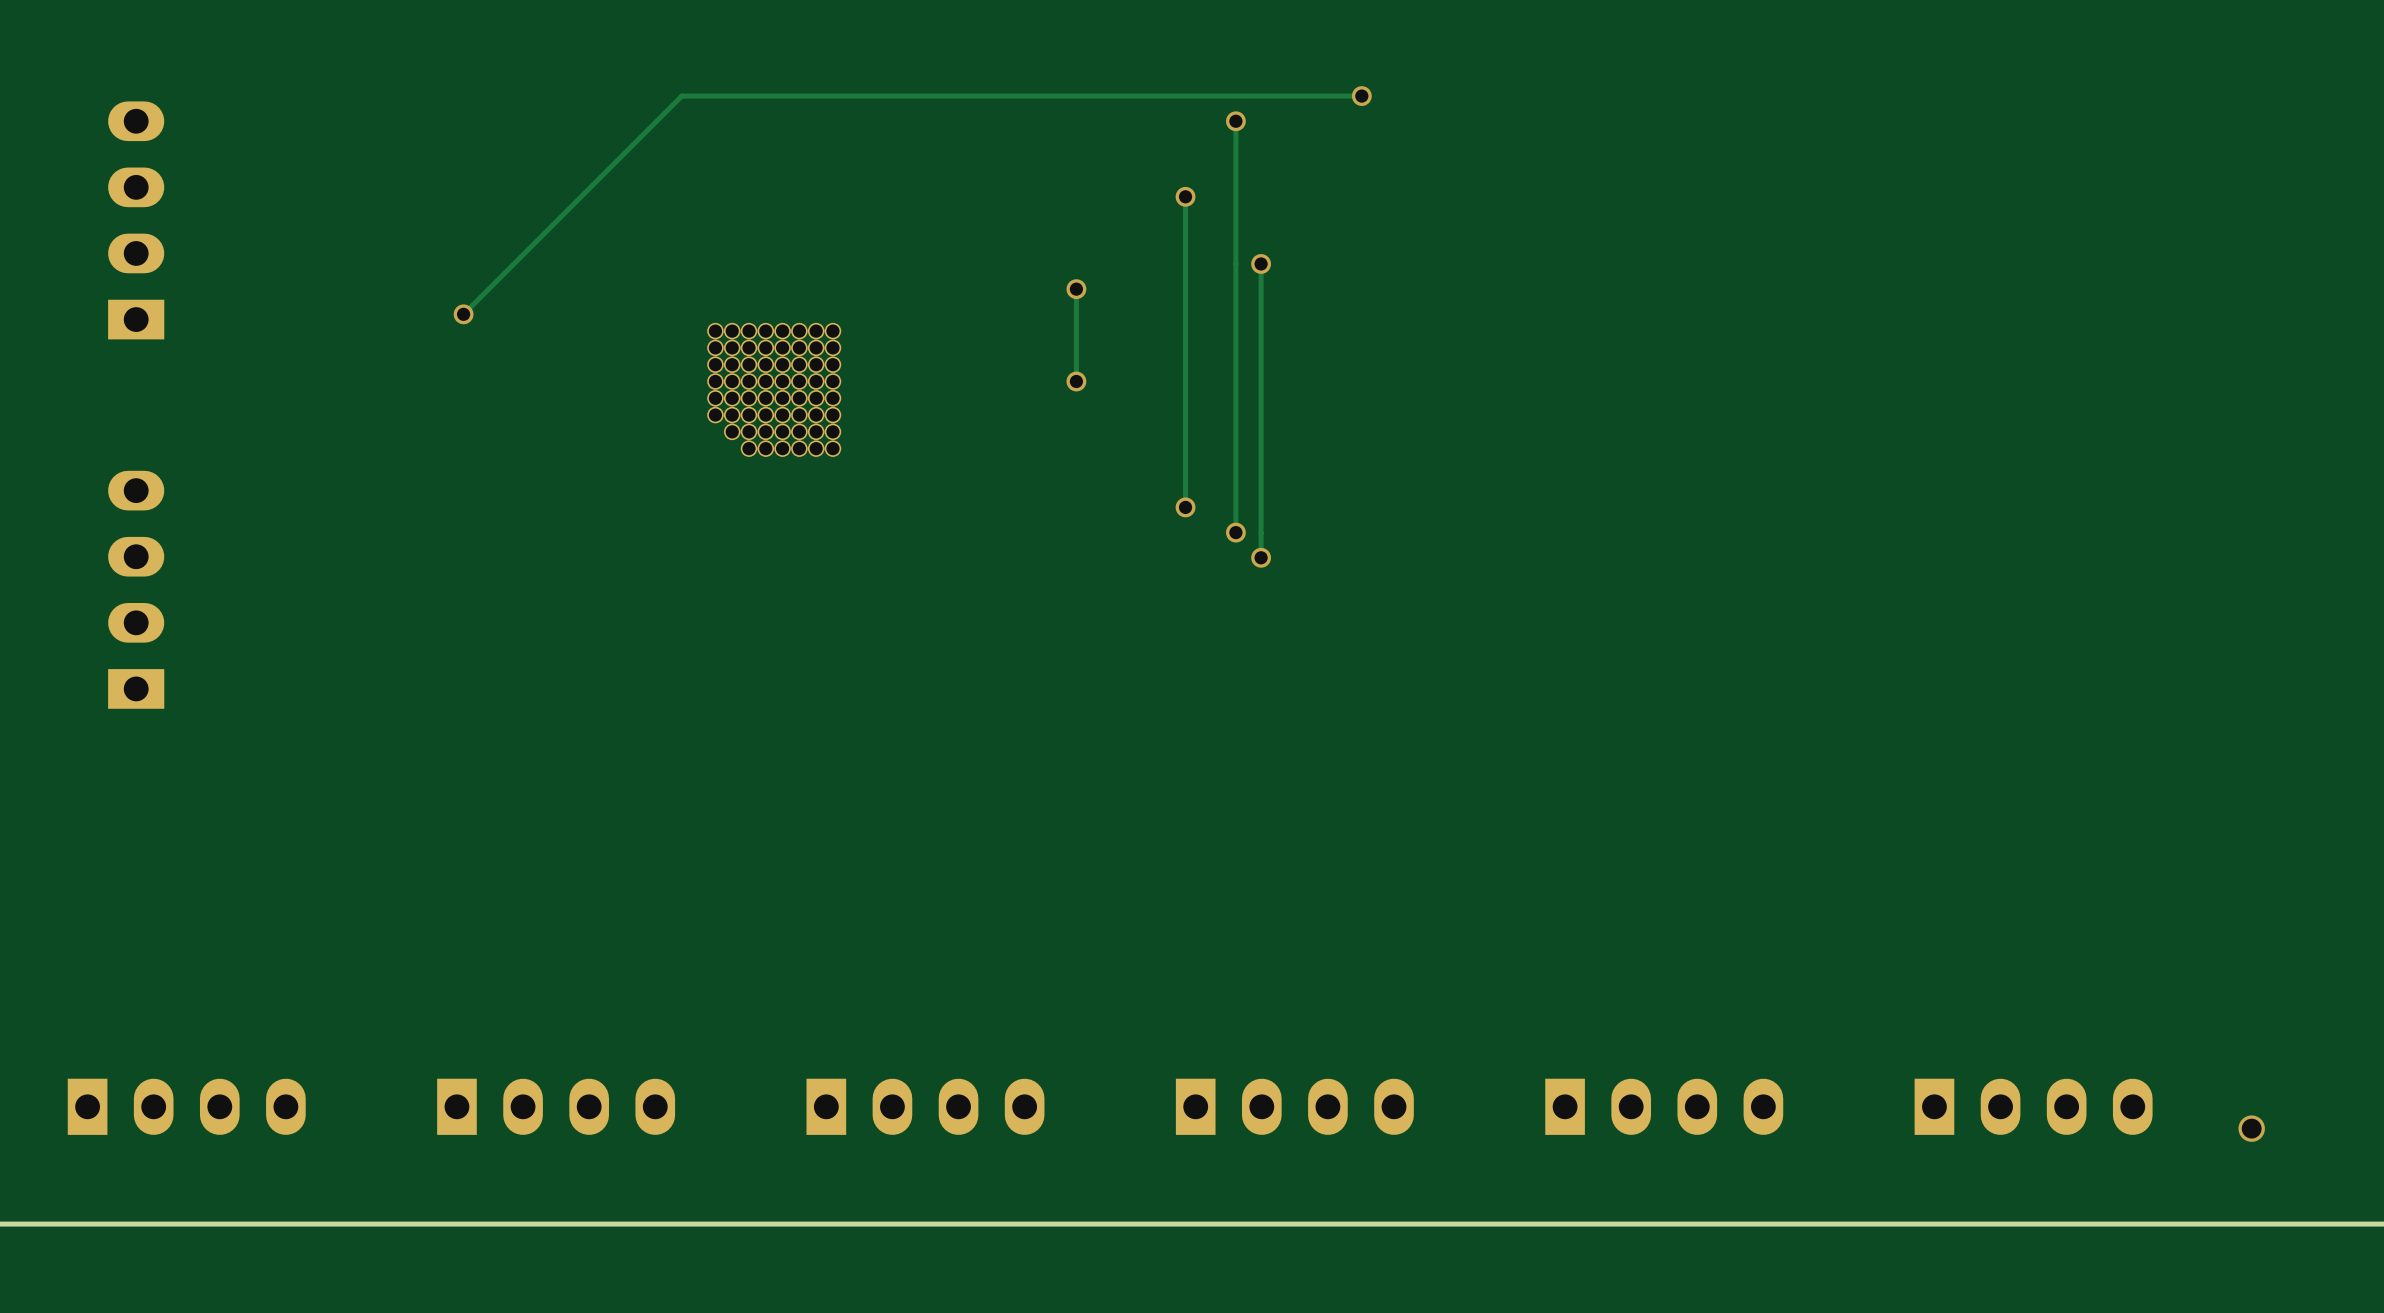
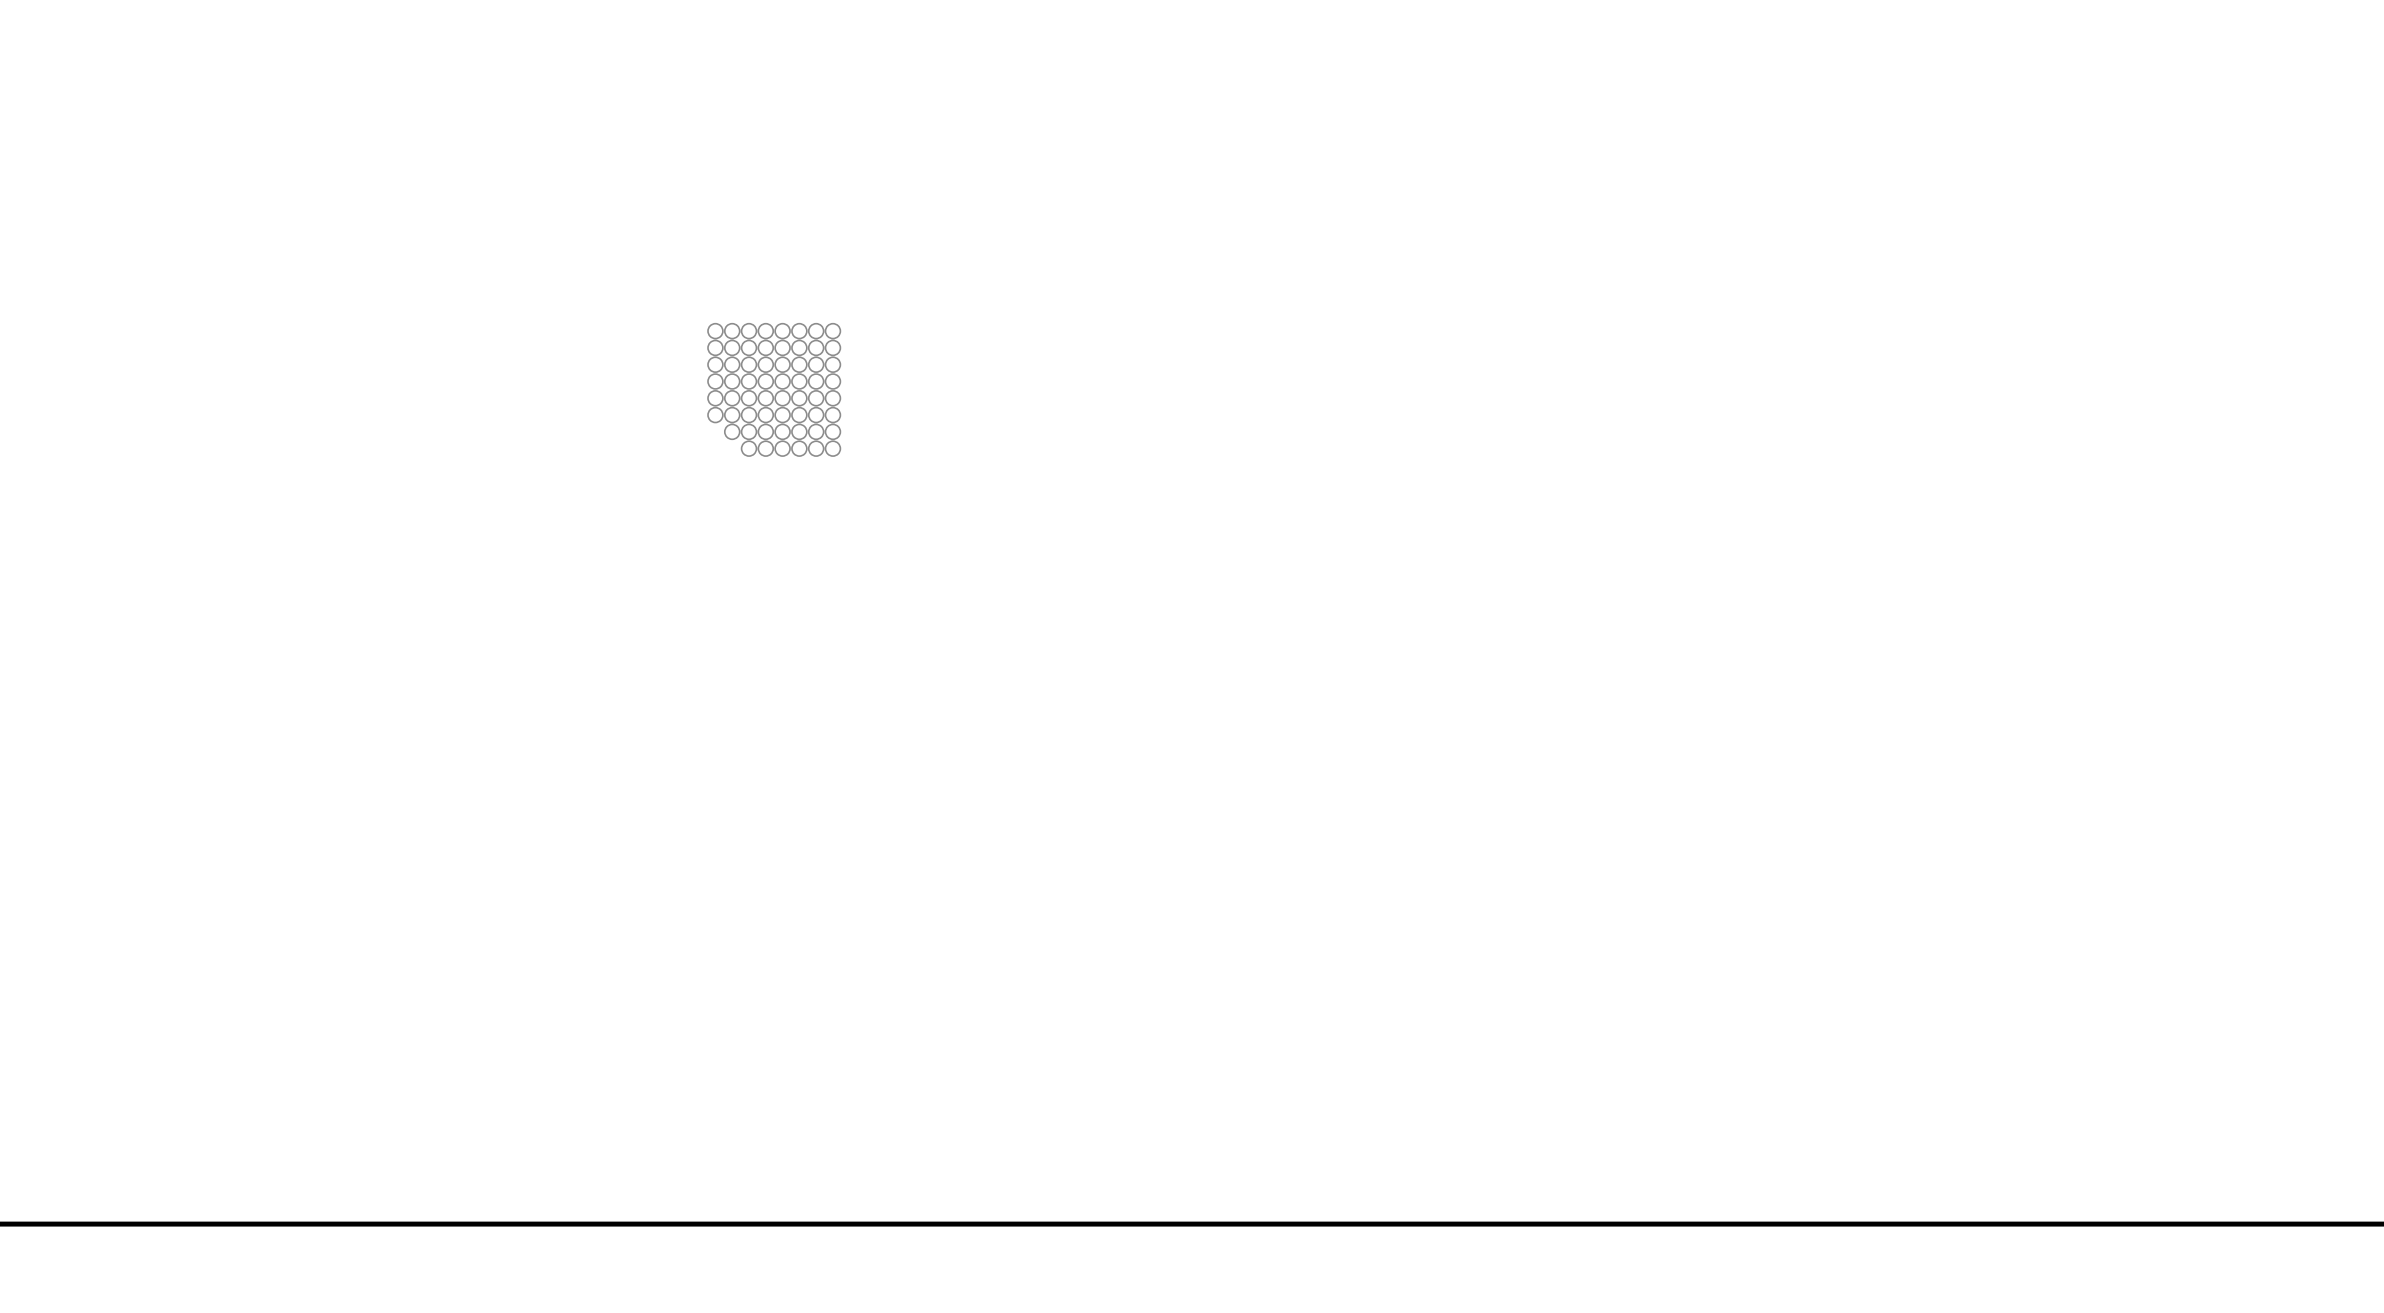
track: (1361, 96) (681, 96) (463, 314) -> none
via: (1361, 96) -> none
track: (1235, 121) (1235, 532) -> none
via: (1235, 121) -> none
track: (1185, 196) (1185, 507) -> none
via: (1185, 196) -> none
part: (136, 220) -> none
track: (1261, 263) (1261, 557) -> none
via: (1261, 263) -> none
track: (1076, 289) (1076, 381) -> none
via: (1076, 289) -> none
via: (463, 314) -> none
via: (1076, 381) -> none
via: (1185, 507) -> none
via: (1235, 532) -> none
via: (1261, 557) -> none
part: (136, 589) -> none
part: (186, 1106) -> none
part: (556, 1106) -> none
part: (925, 1106) -> none
part: (1294, 1106) -> none
part: (1664, 1106) -> none
part: (2033, 1106) -> none
via: (2251, 1128) -> none

